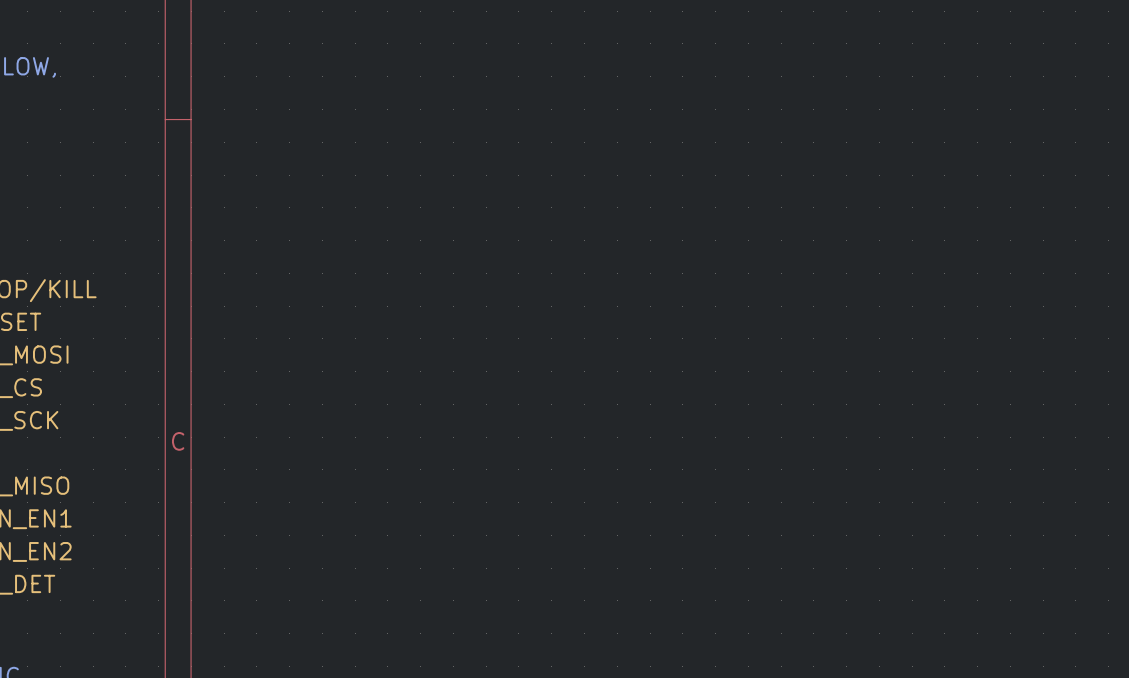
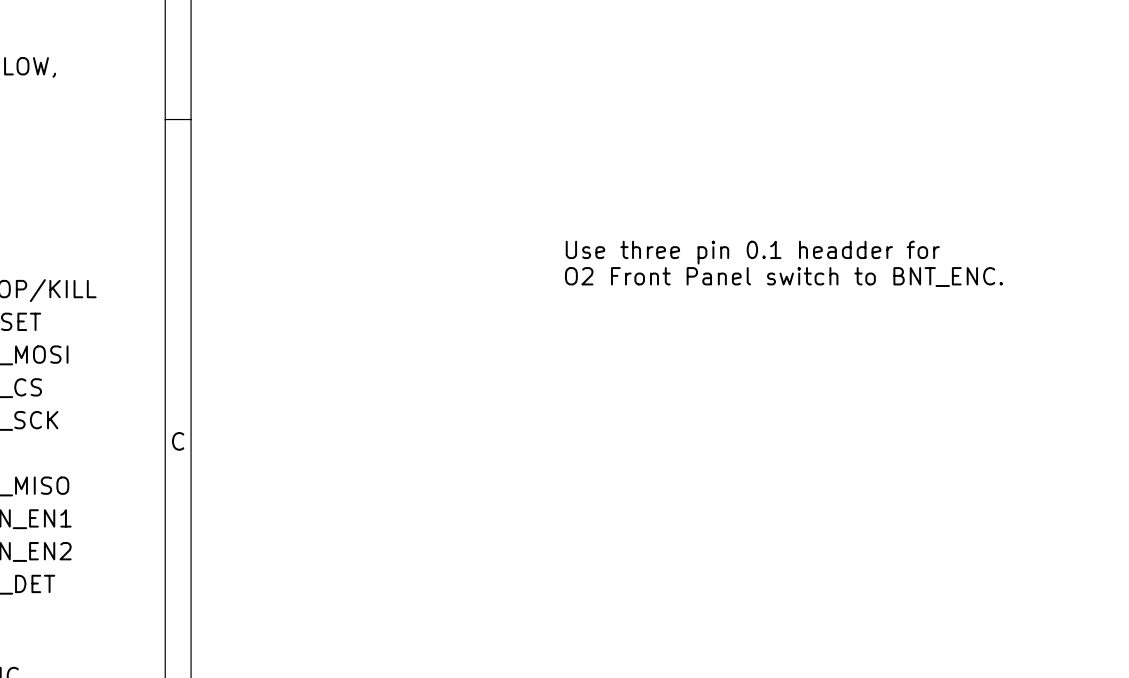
text: none -> Use three pin 0.1 headder for (752, 252)
text: none -> O2 Front Panel switch to BNT_ENC. (783, 277)

